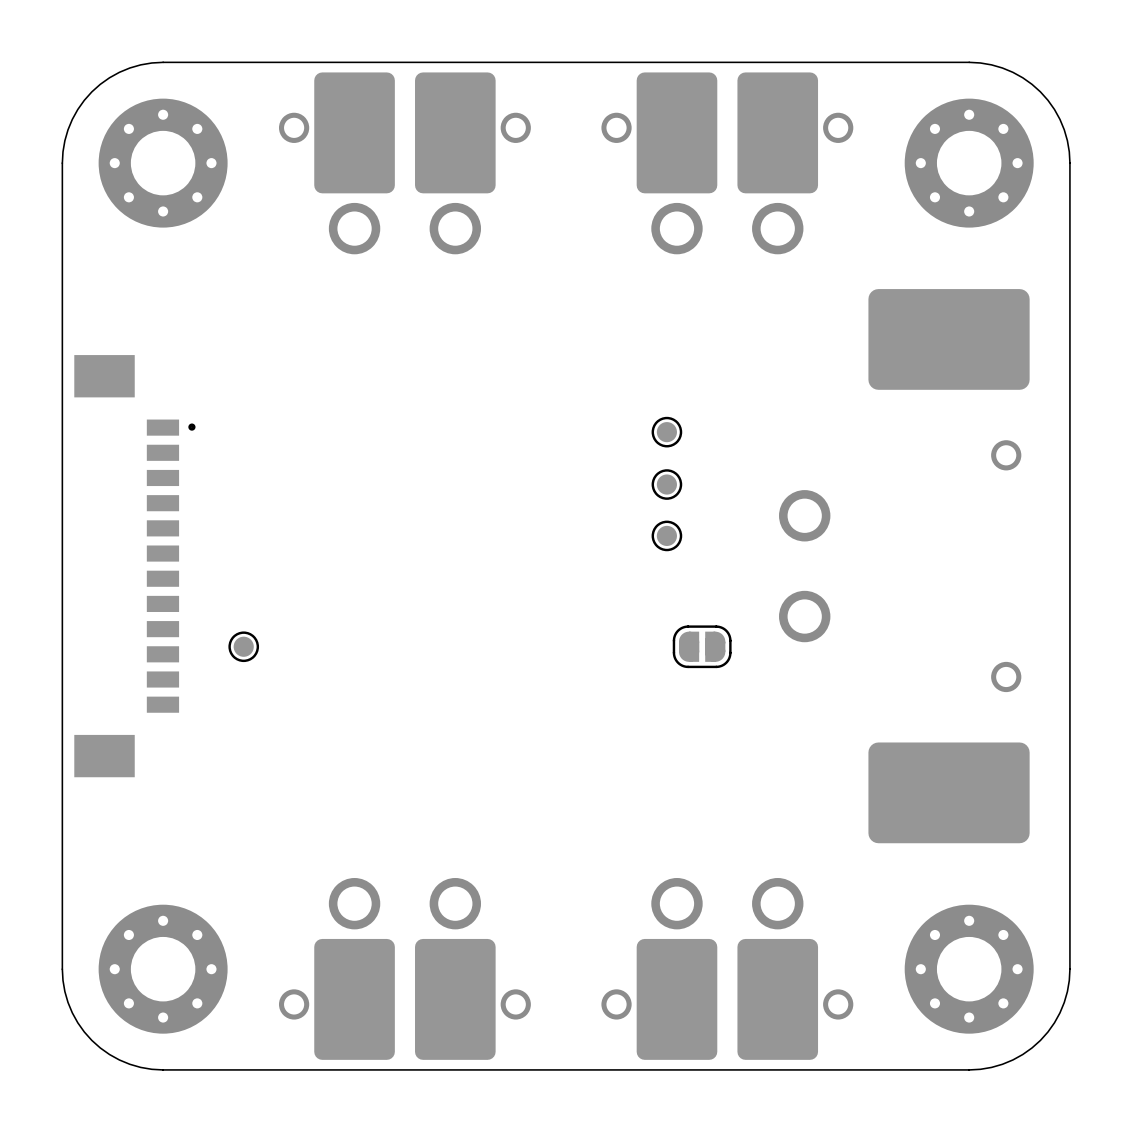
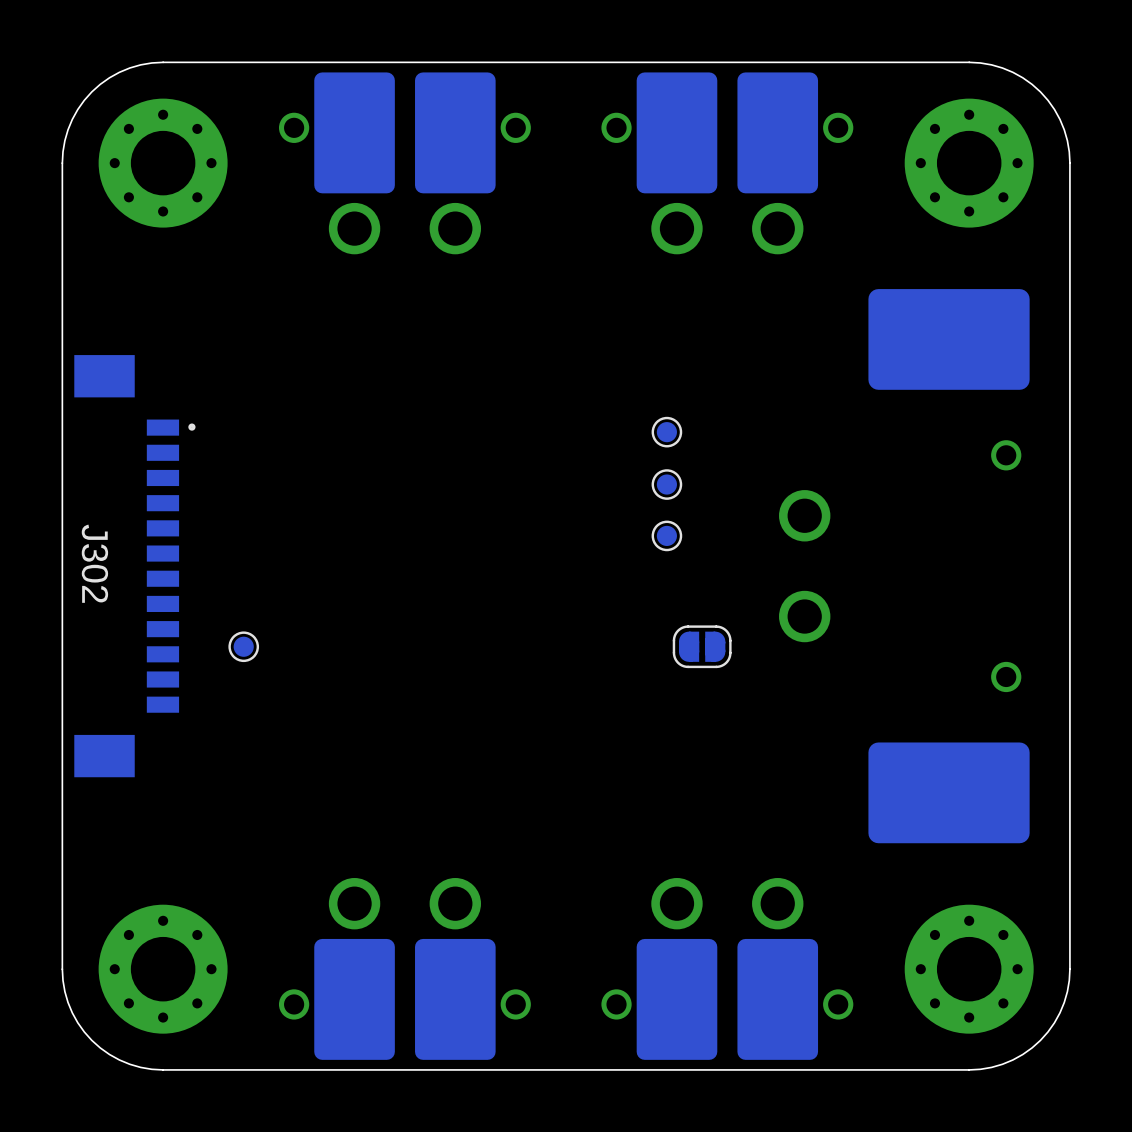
J302 name: none -> J302 (94, 563)

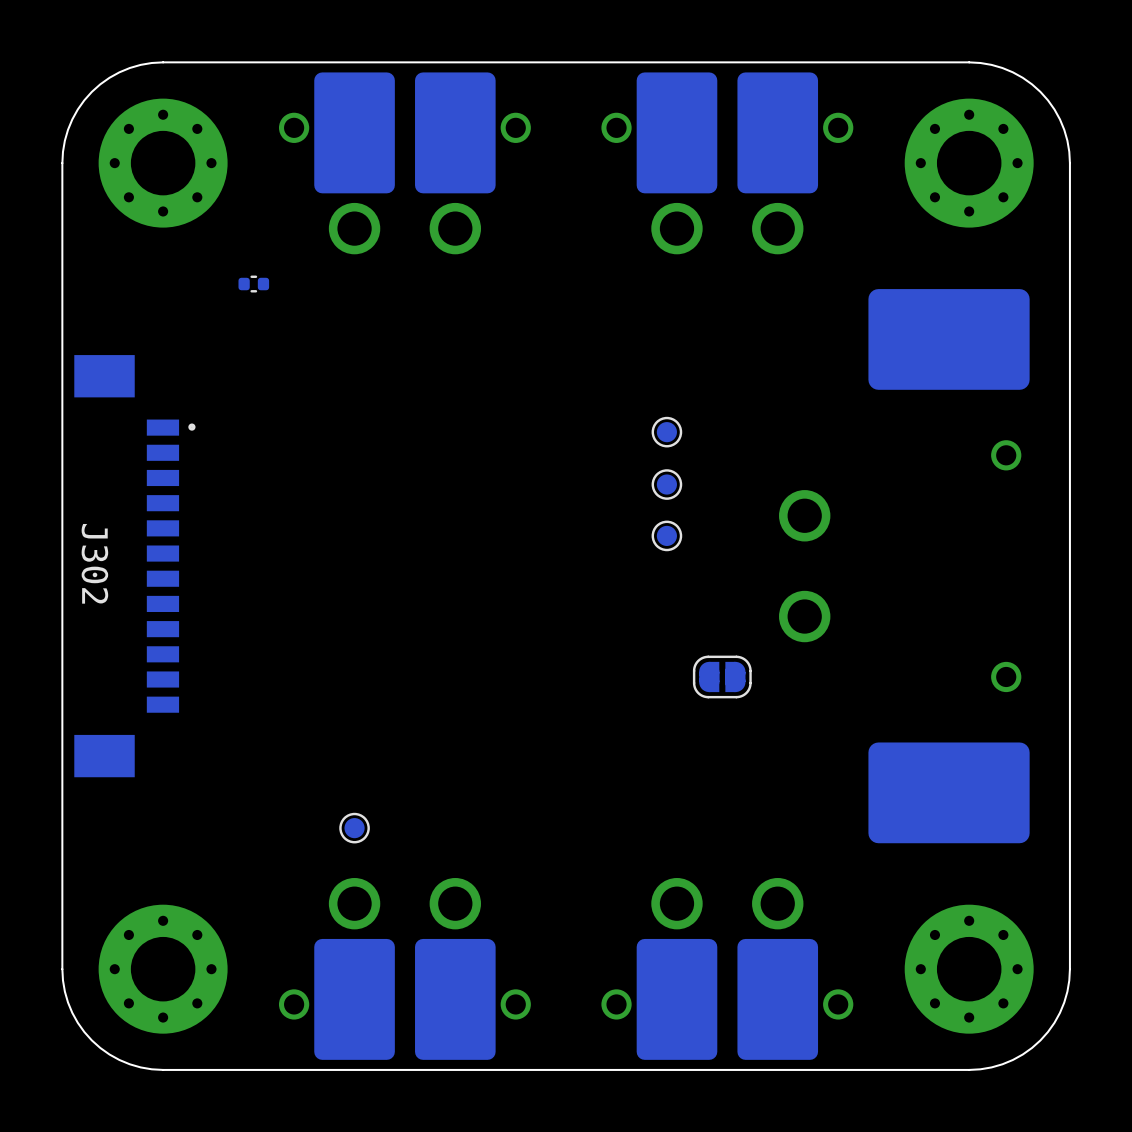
part: none -> (253, 284)
part position: (243, 646) -> (354, 828)
part position: (702, 646) -> (722, 676)

